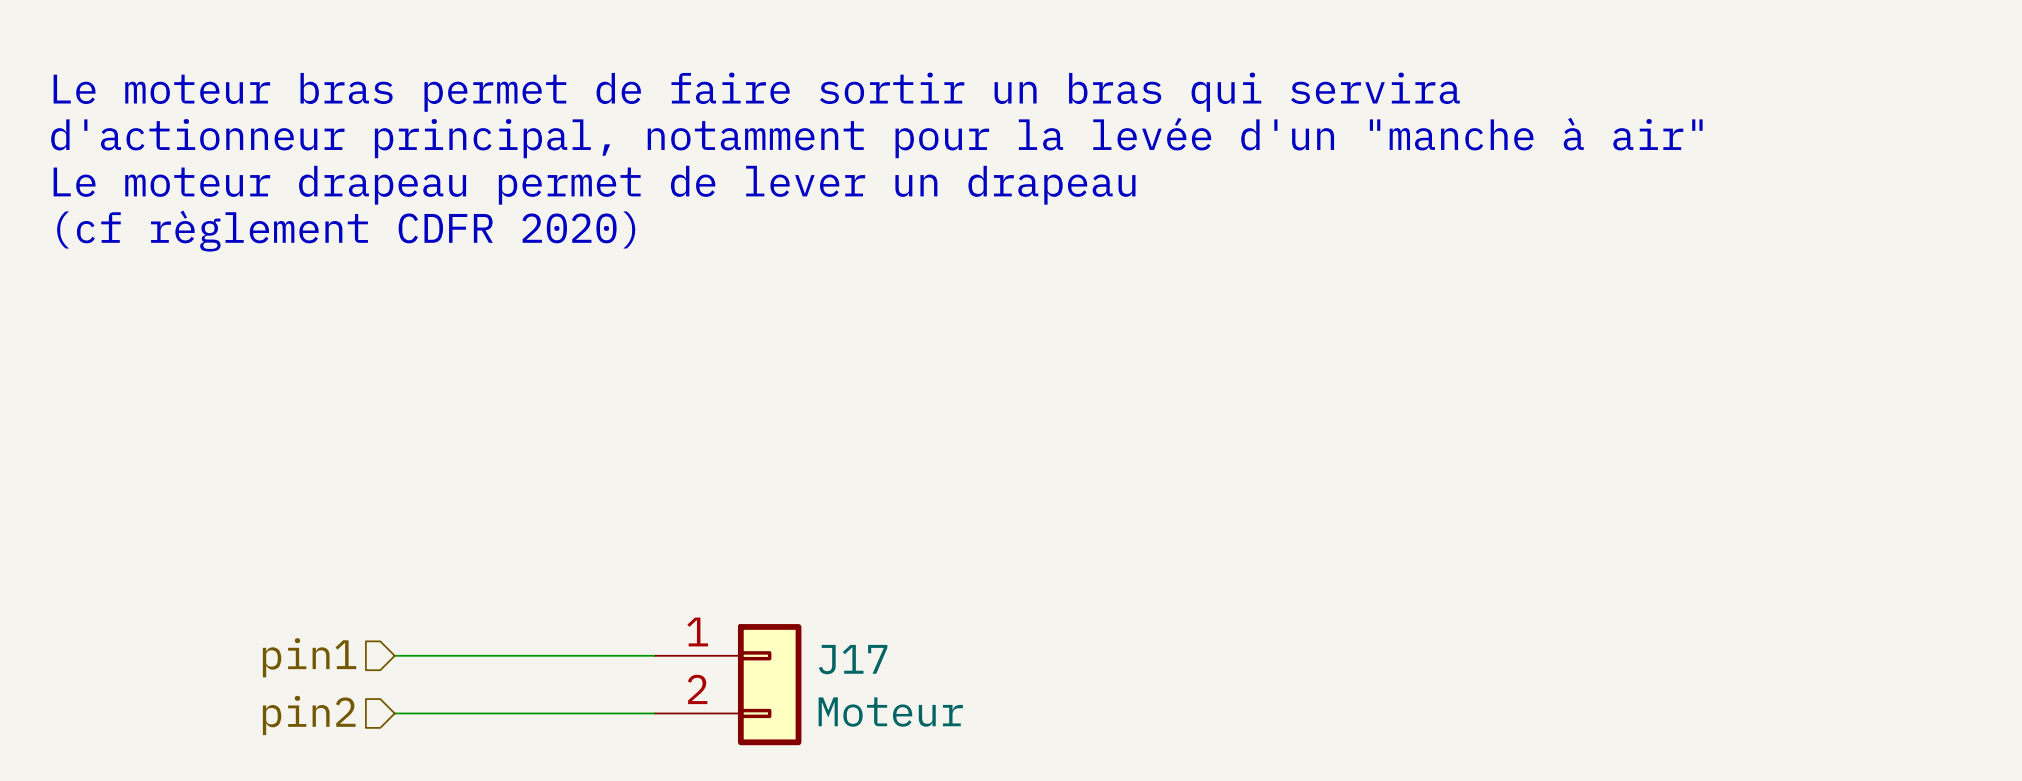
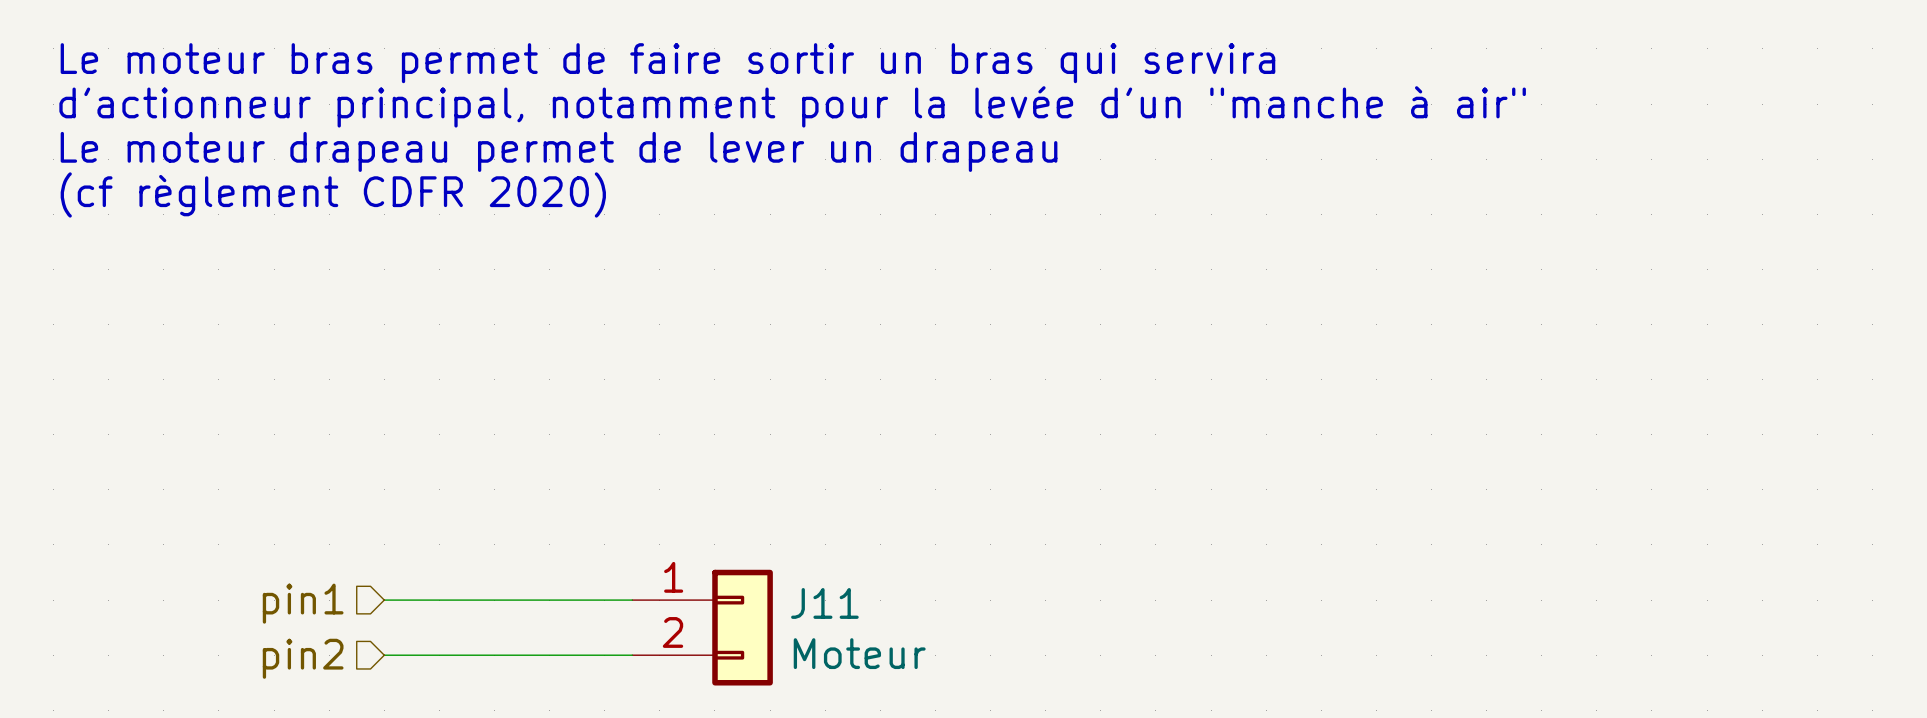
J17 name: J17 (853, 659) -> J11 (824, 603)

